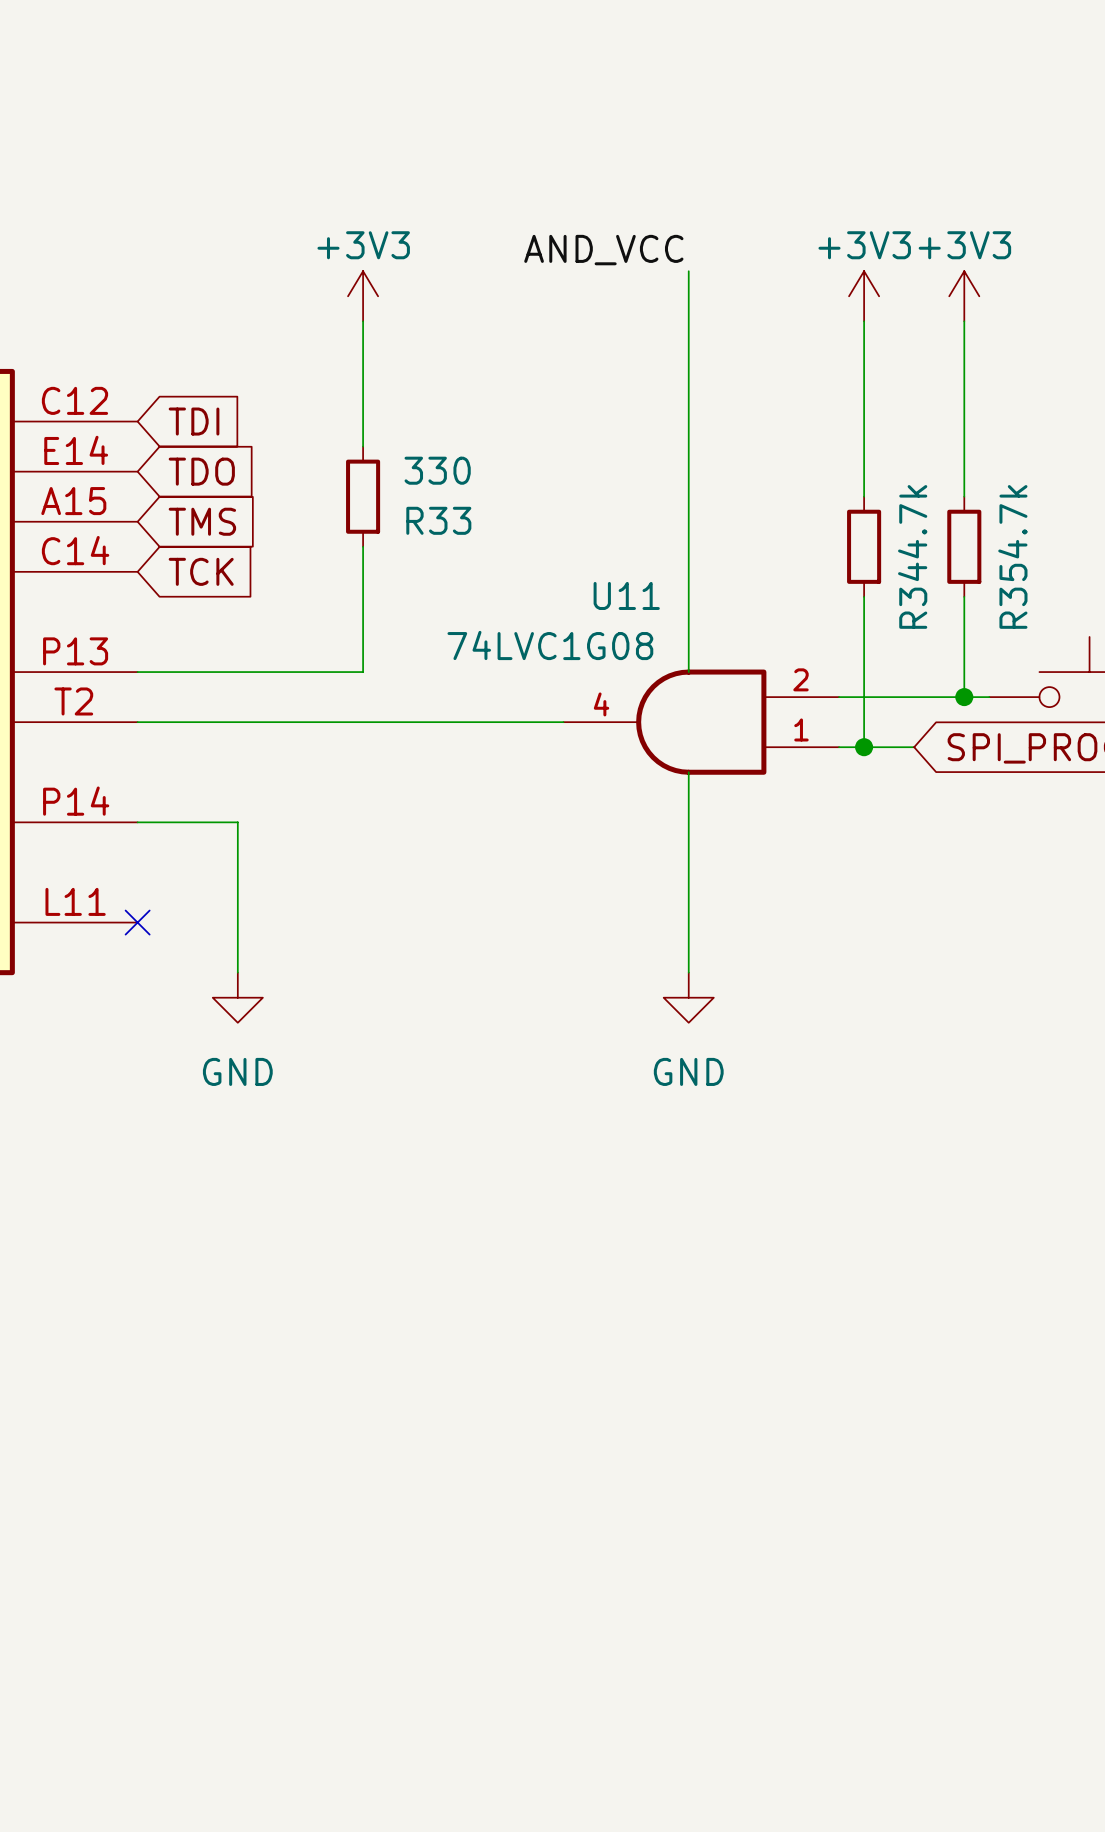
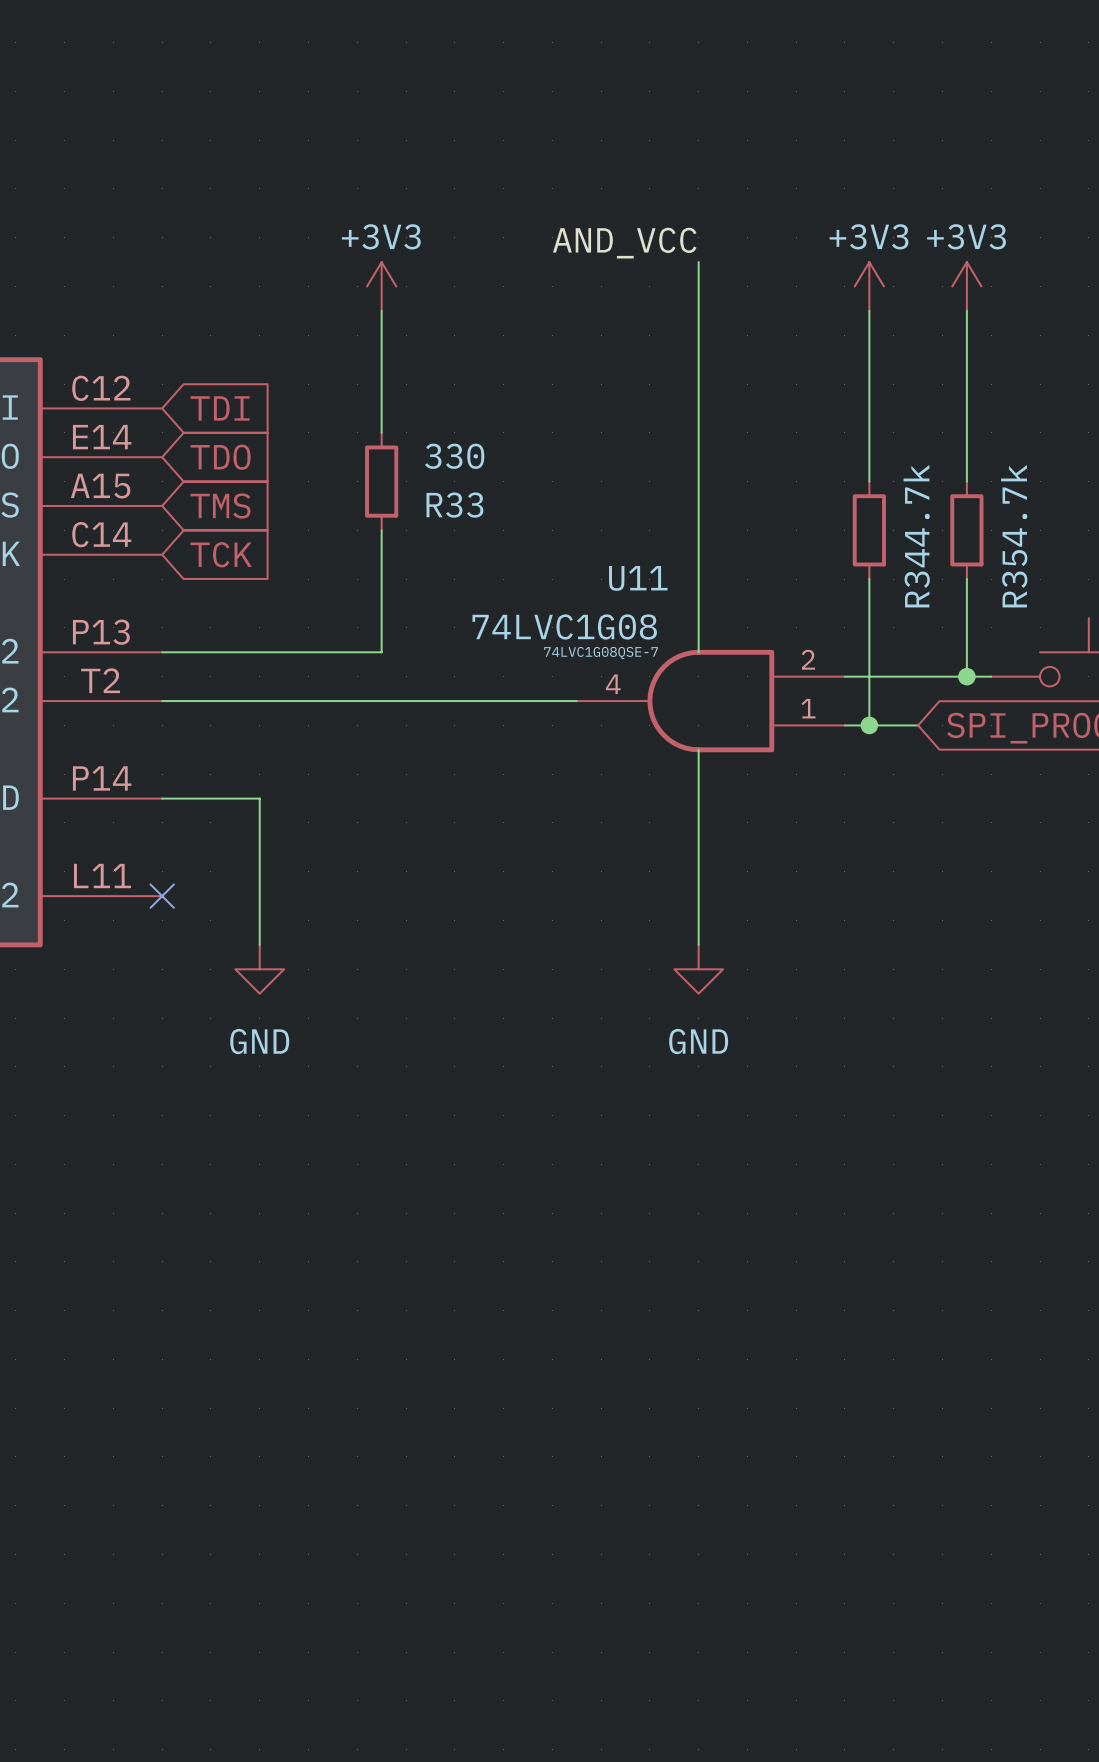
U11 text: none -> 74LVC1G08QSE-7 (601, 652)

